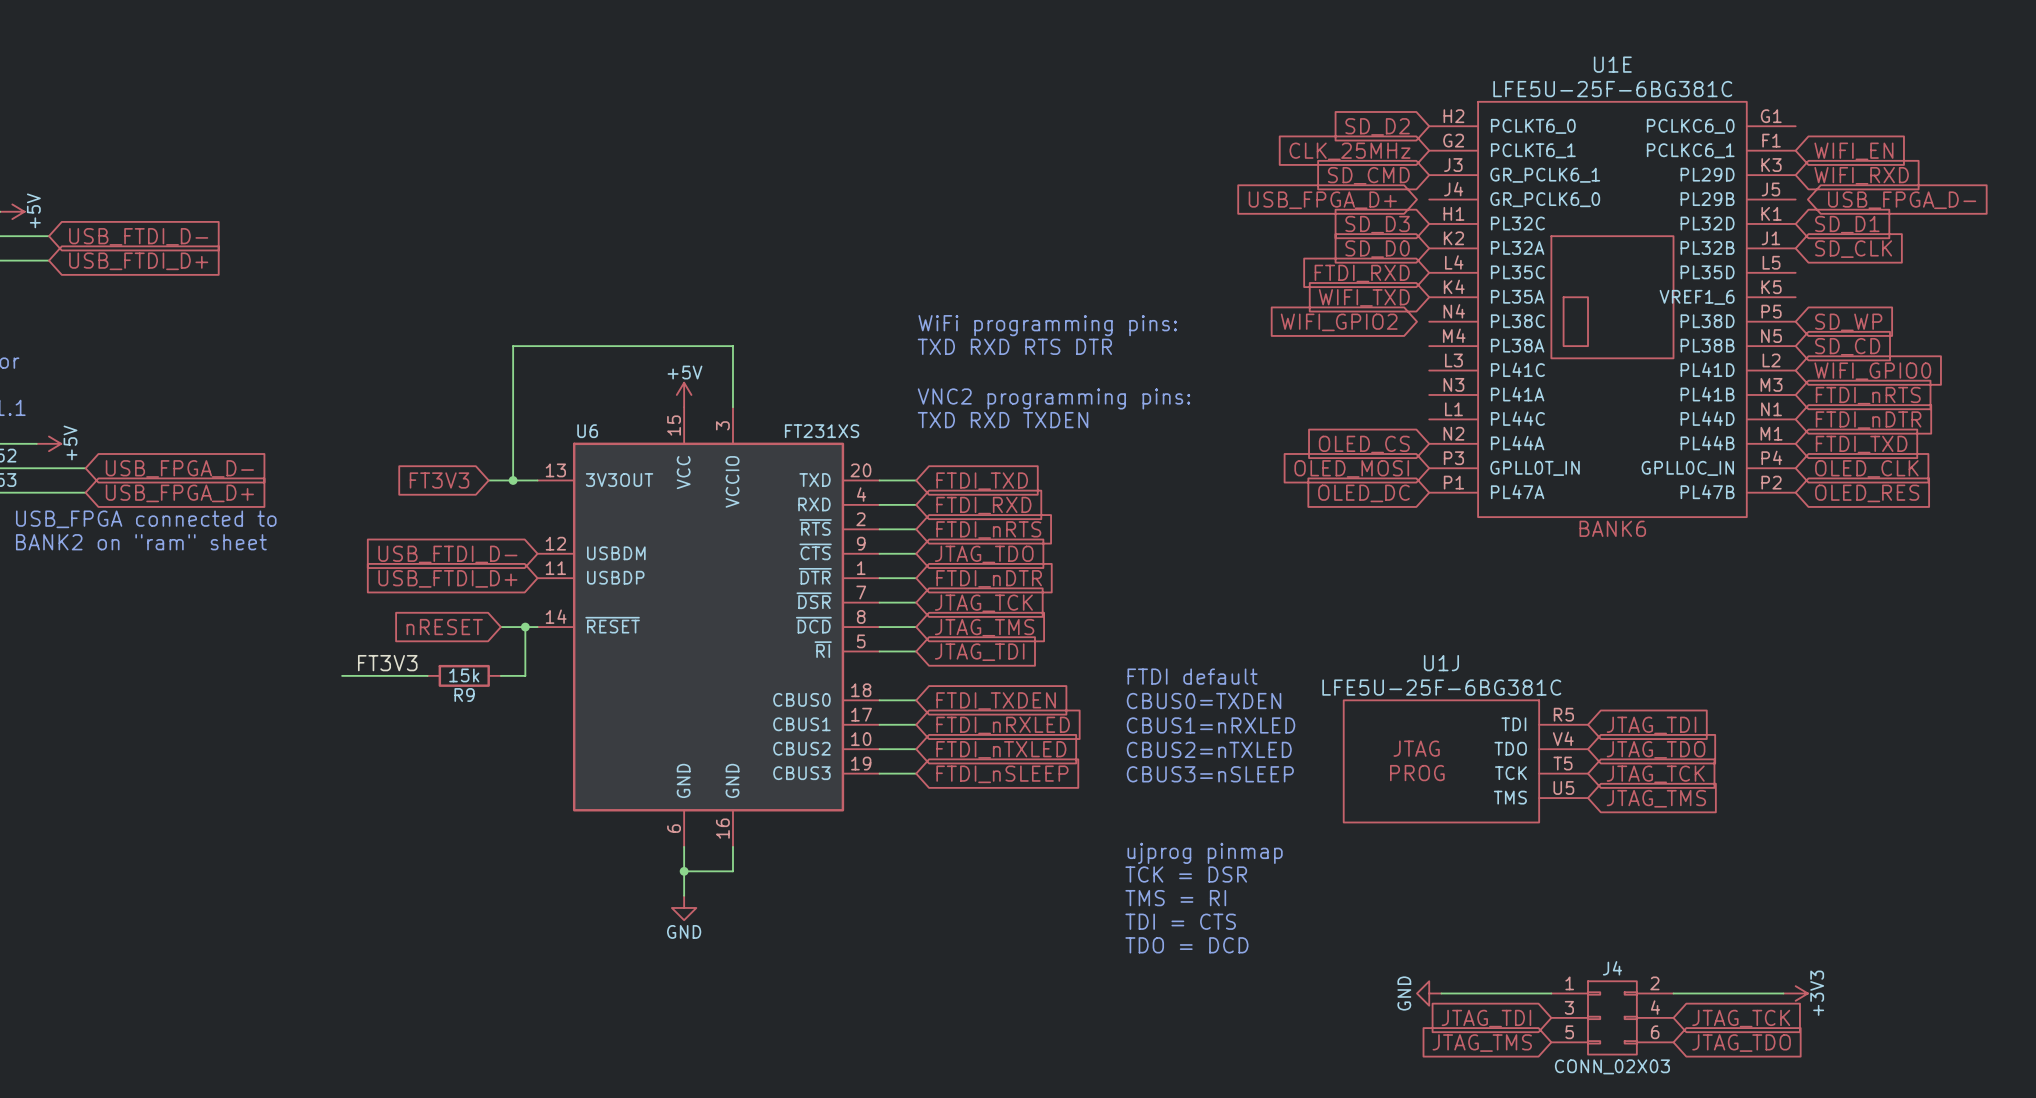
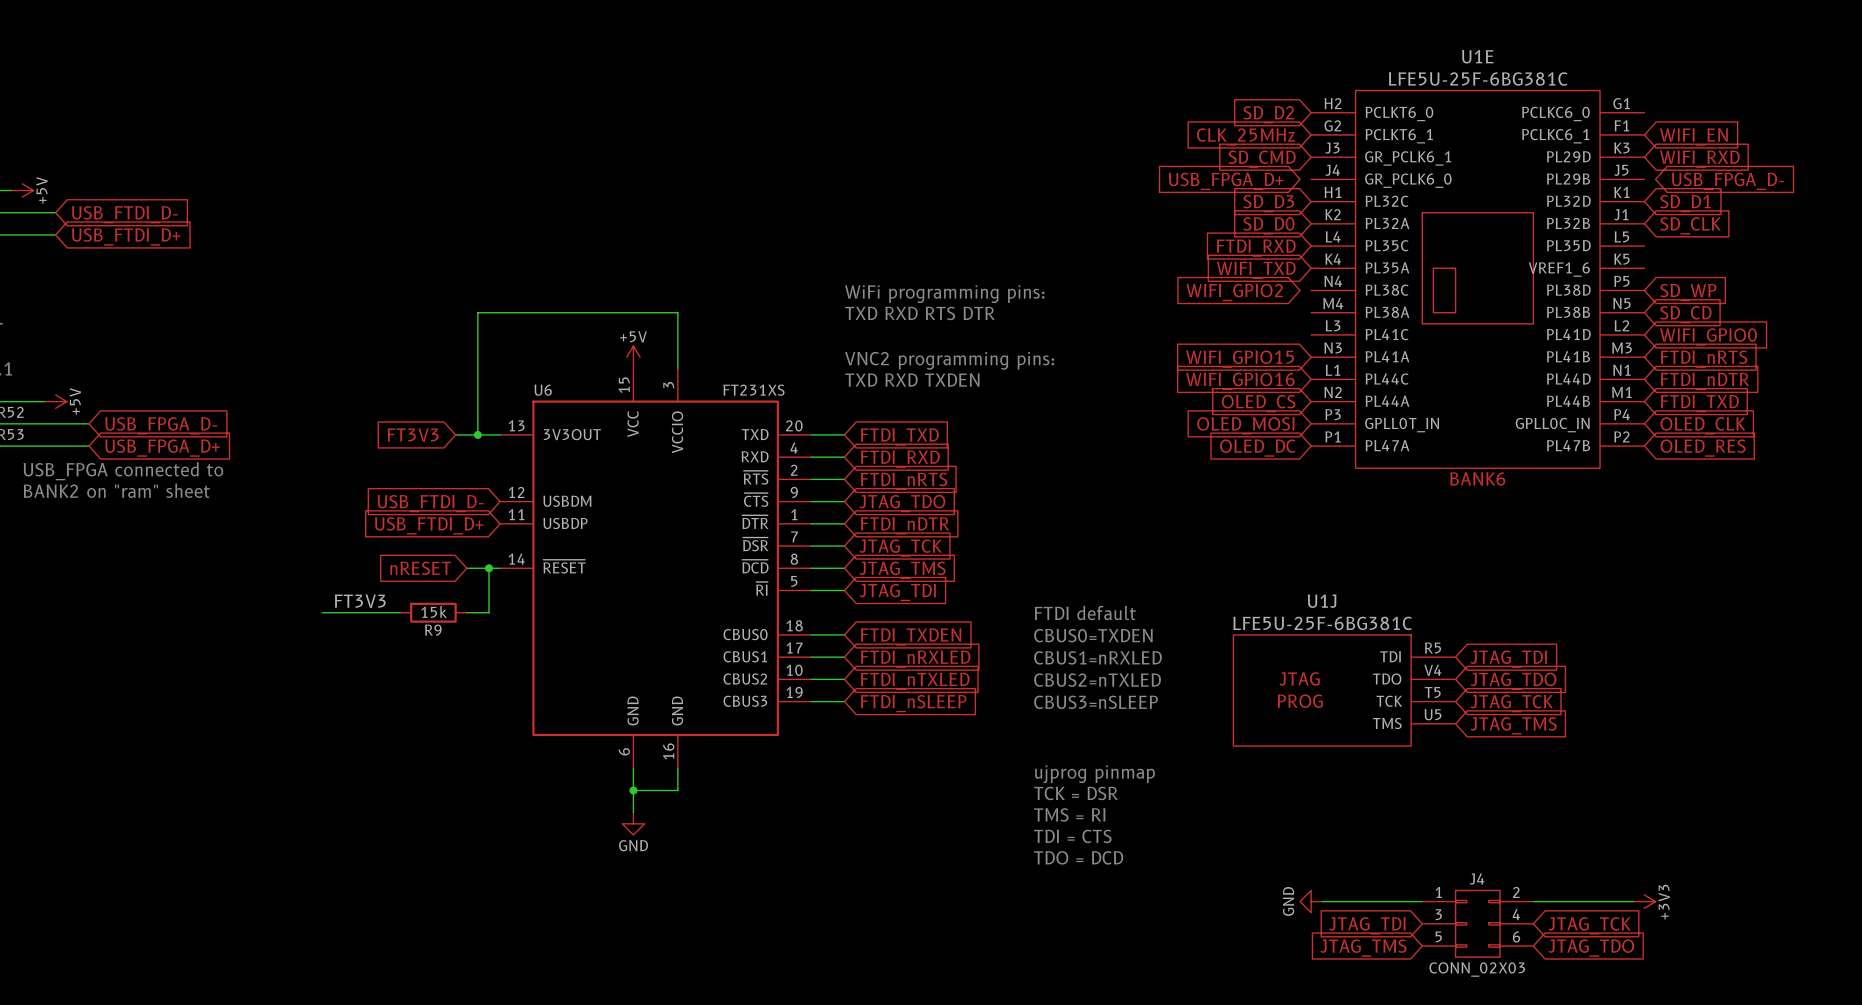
global label: none -> WIFI_GPIO15 (1240, 359)
global label: none -> WIFI_GPIO16 (1240, 381)

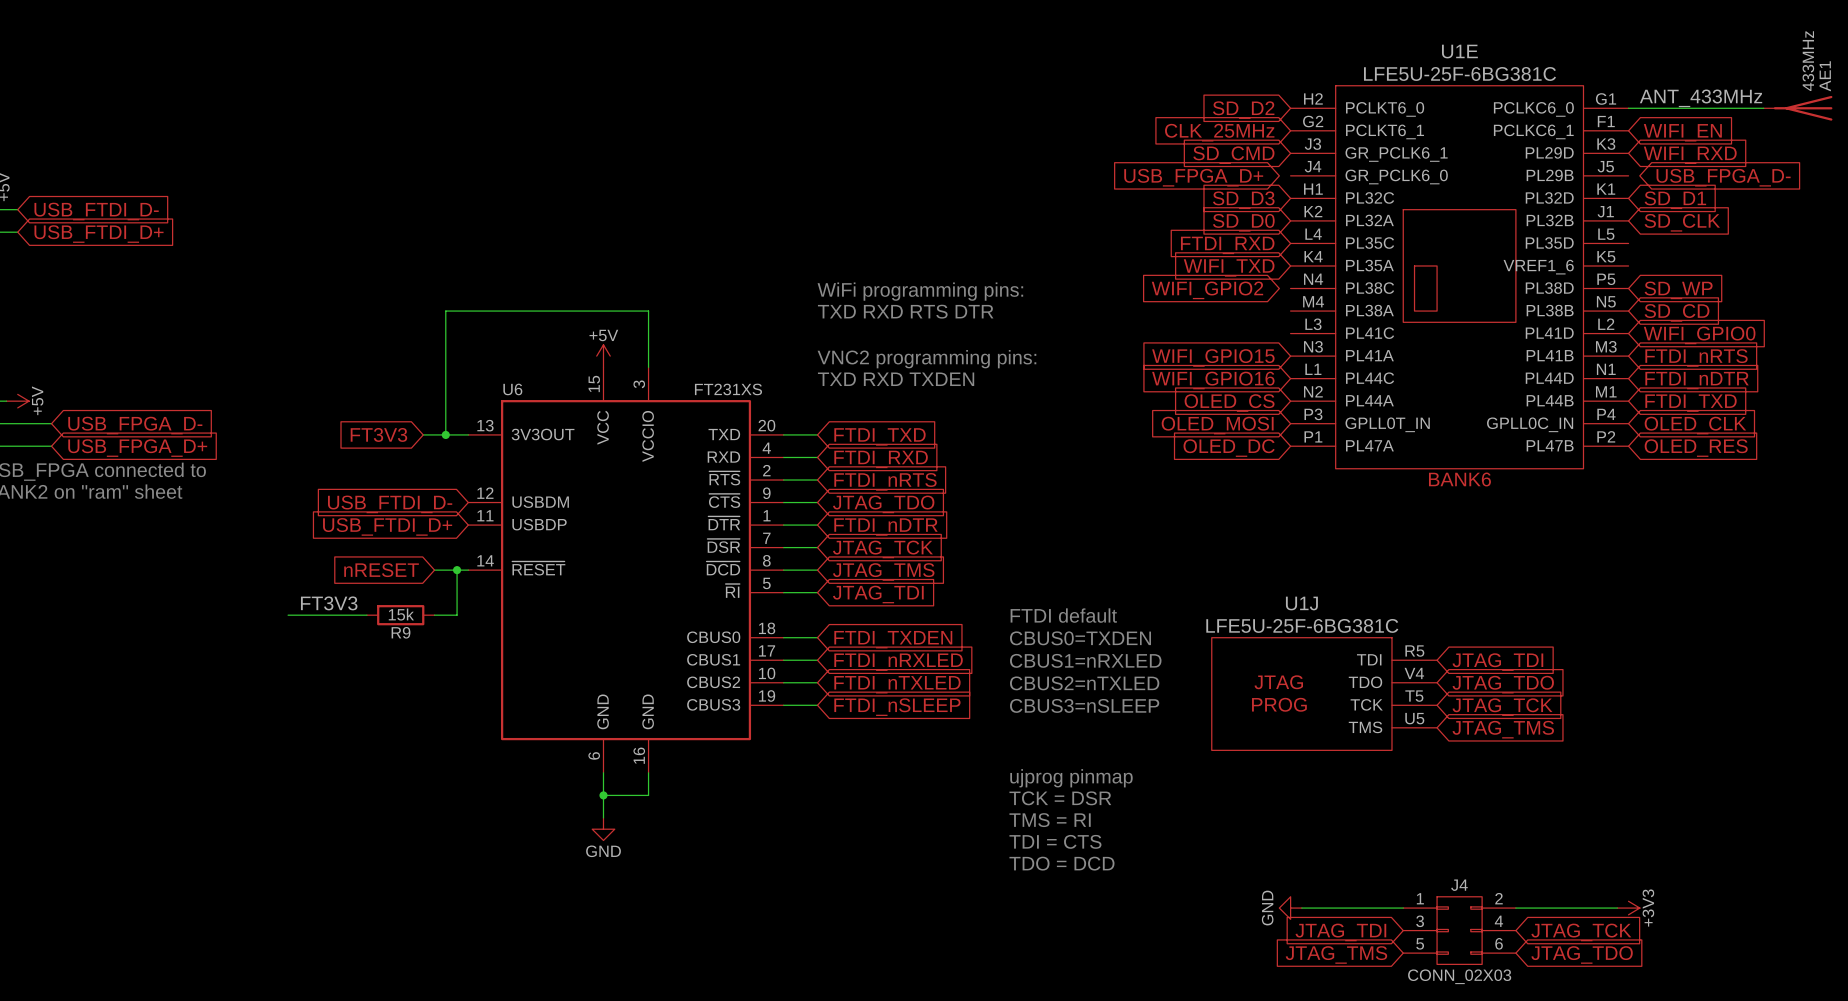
label: none -> ANT_433MHz (1701, 98)
wire: none -> (1628, 108) (1763, 108)
AE1: none -> 433MHz (1798, 108)

